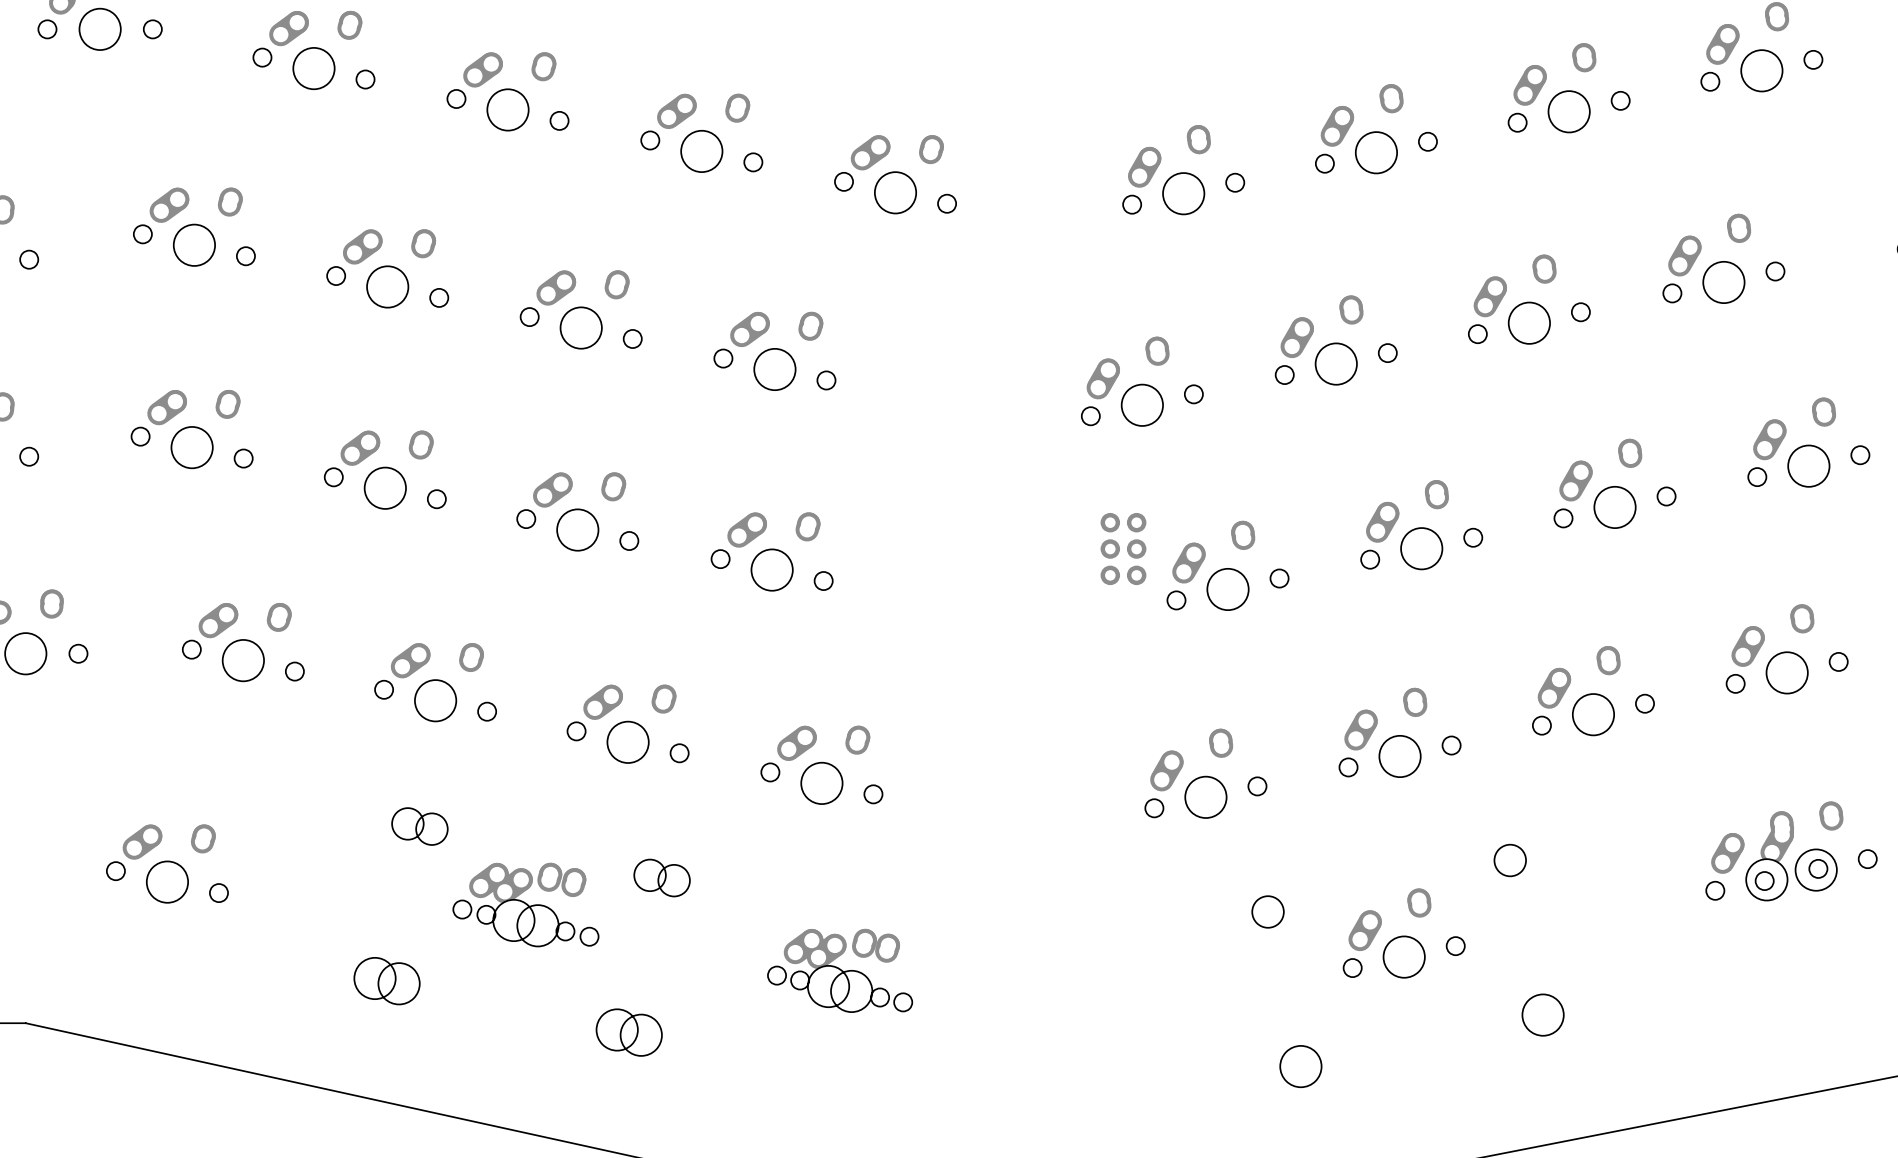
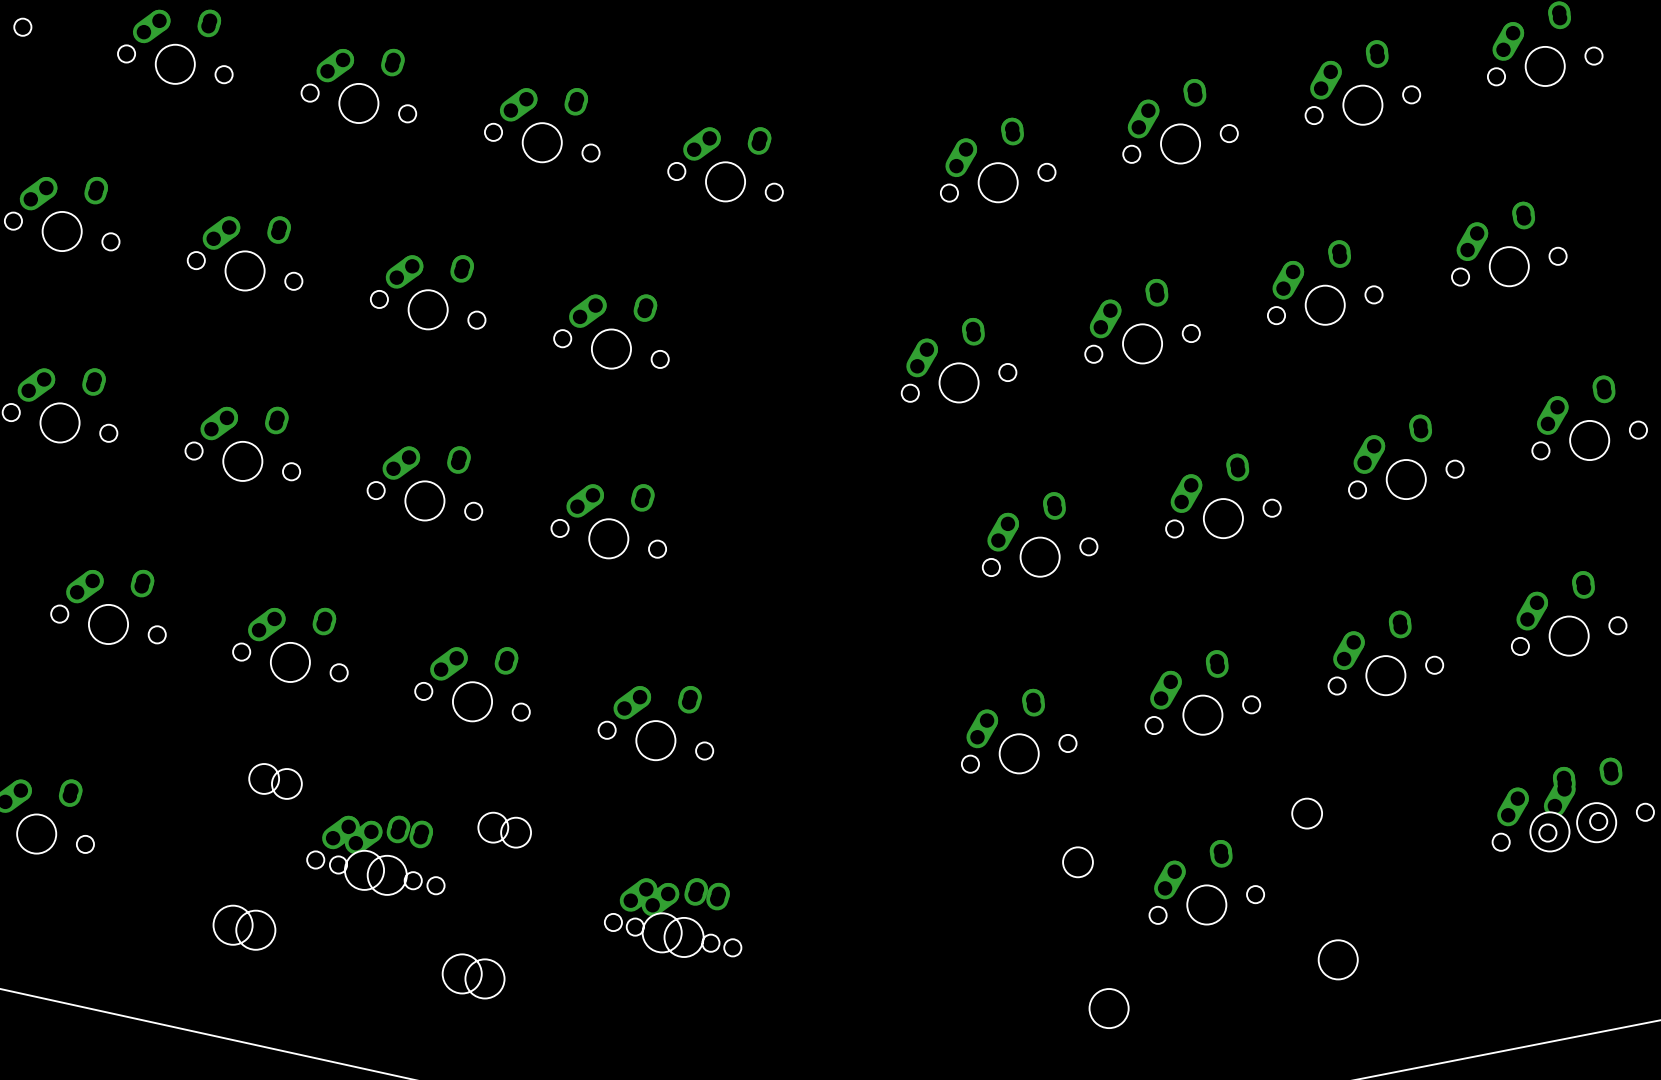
part: (1123, 549) -> none

